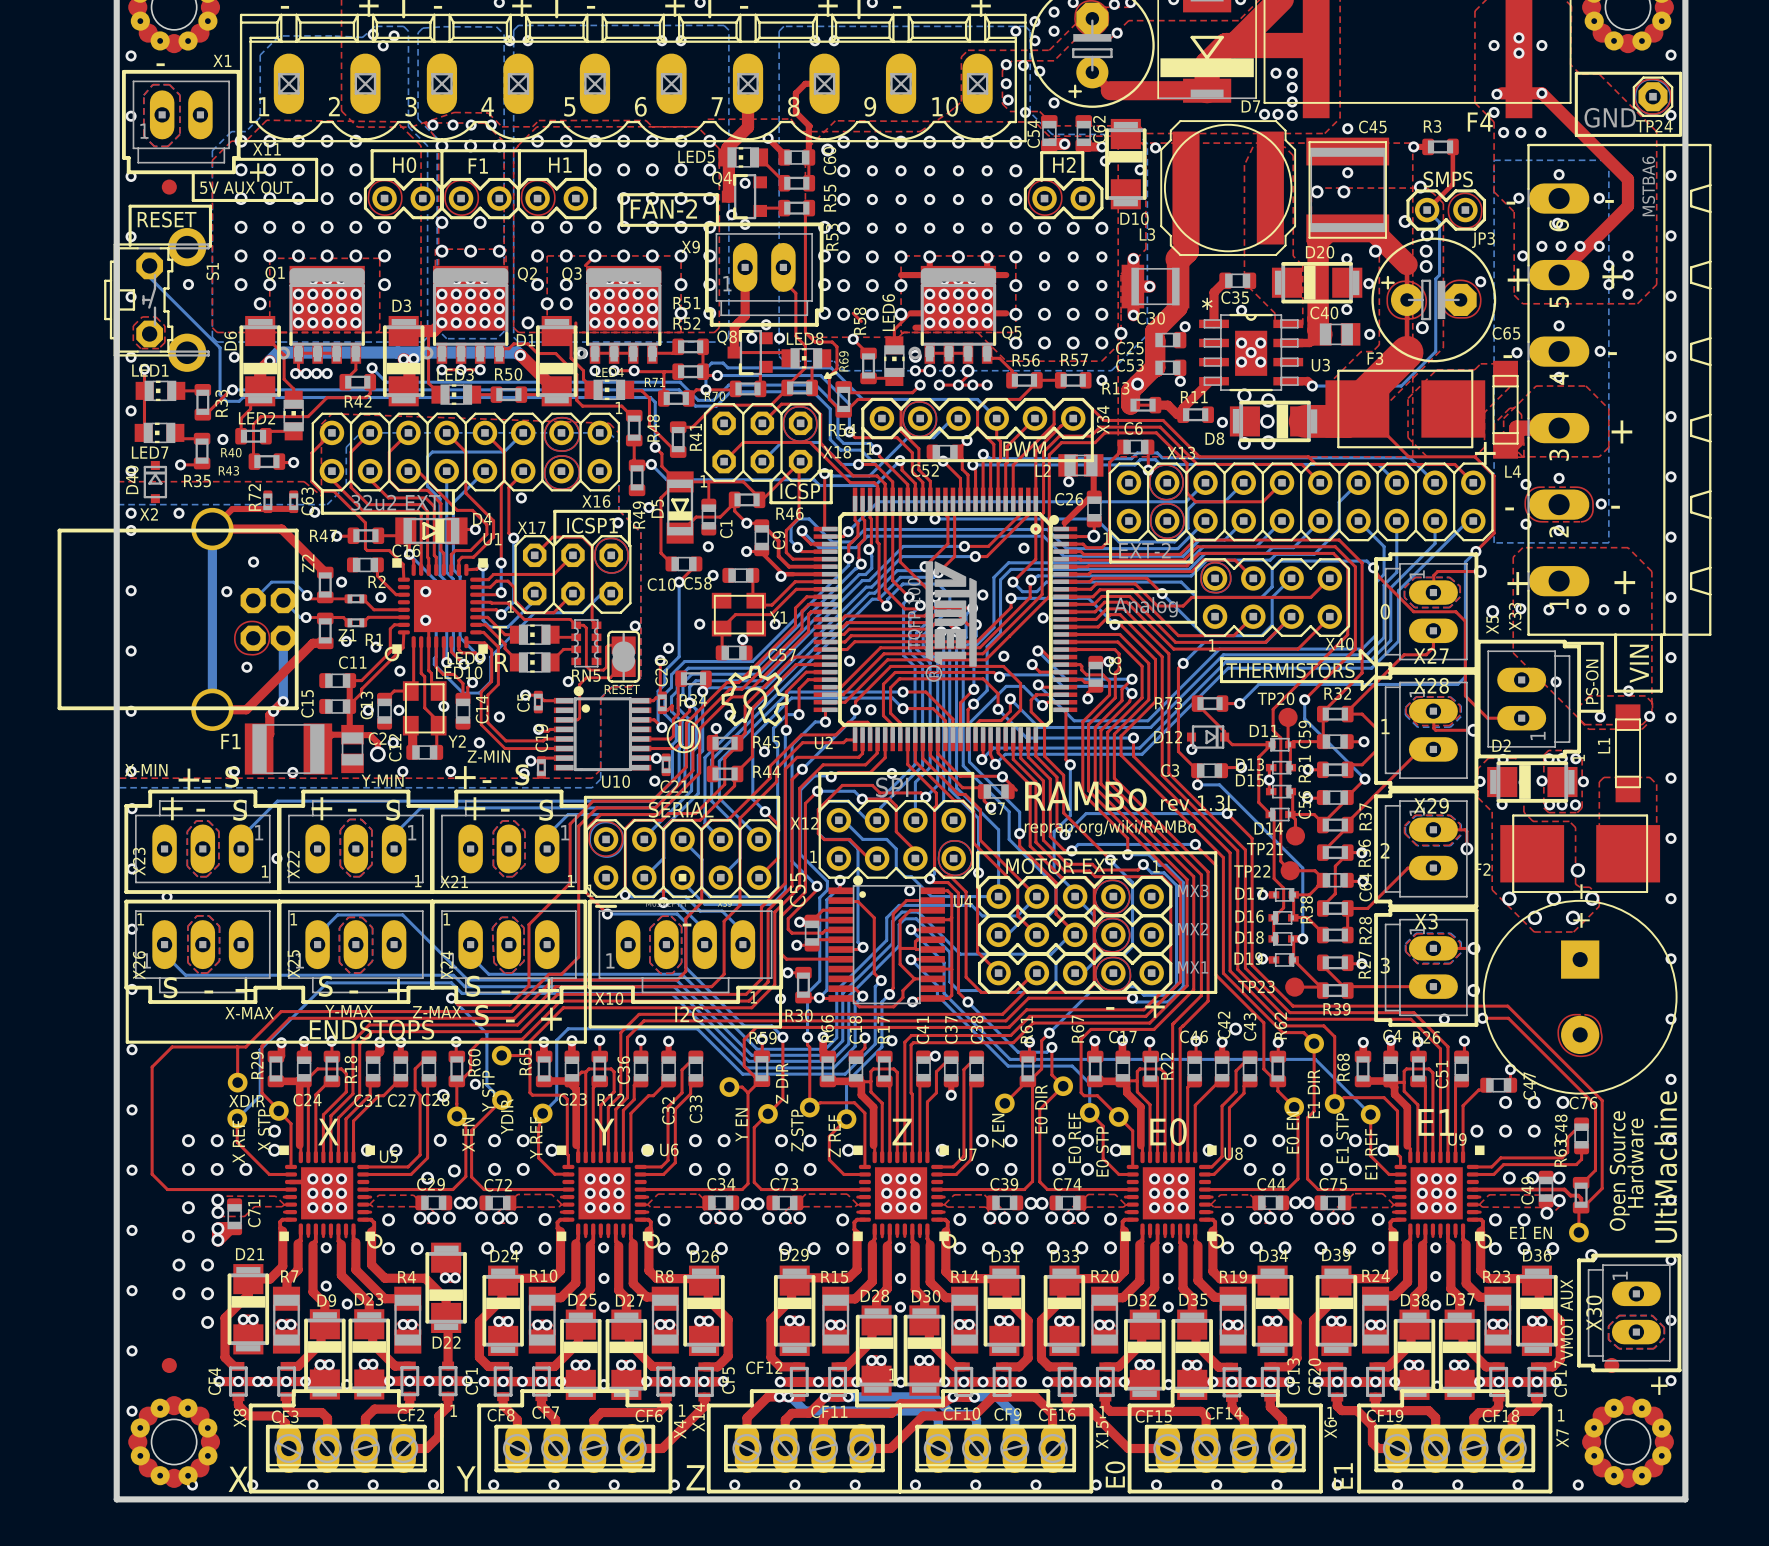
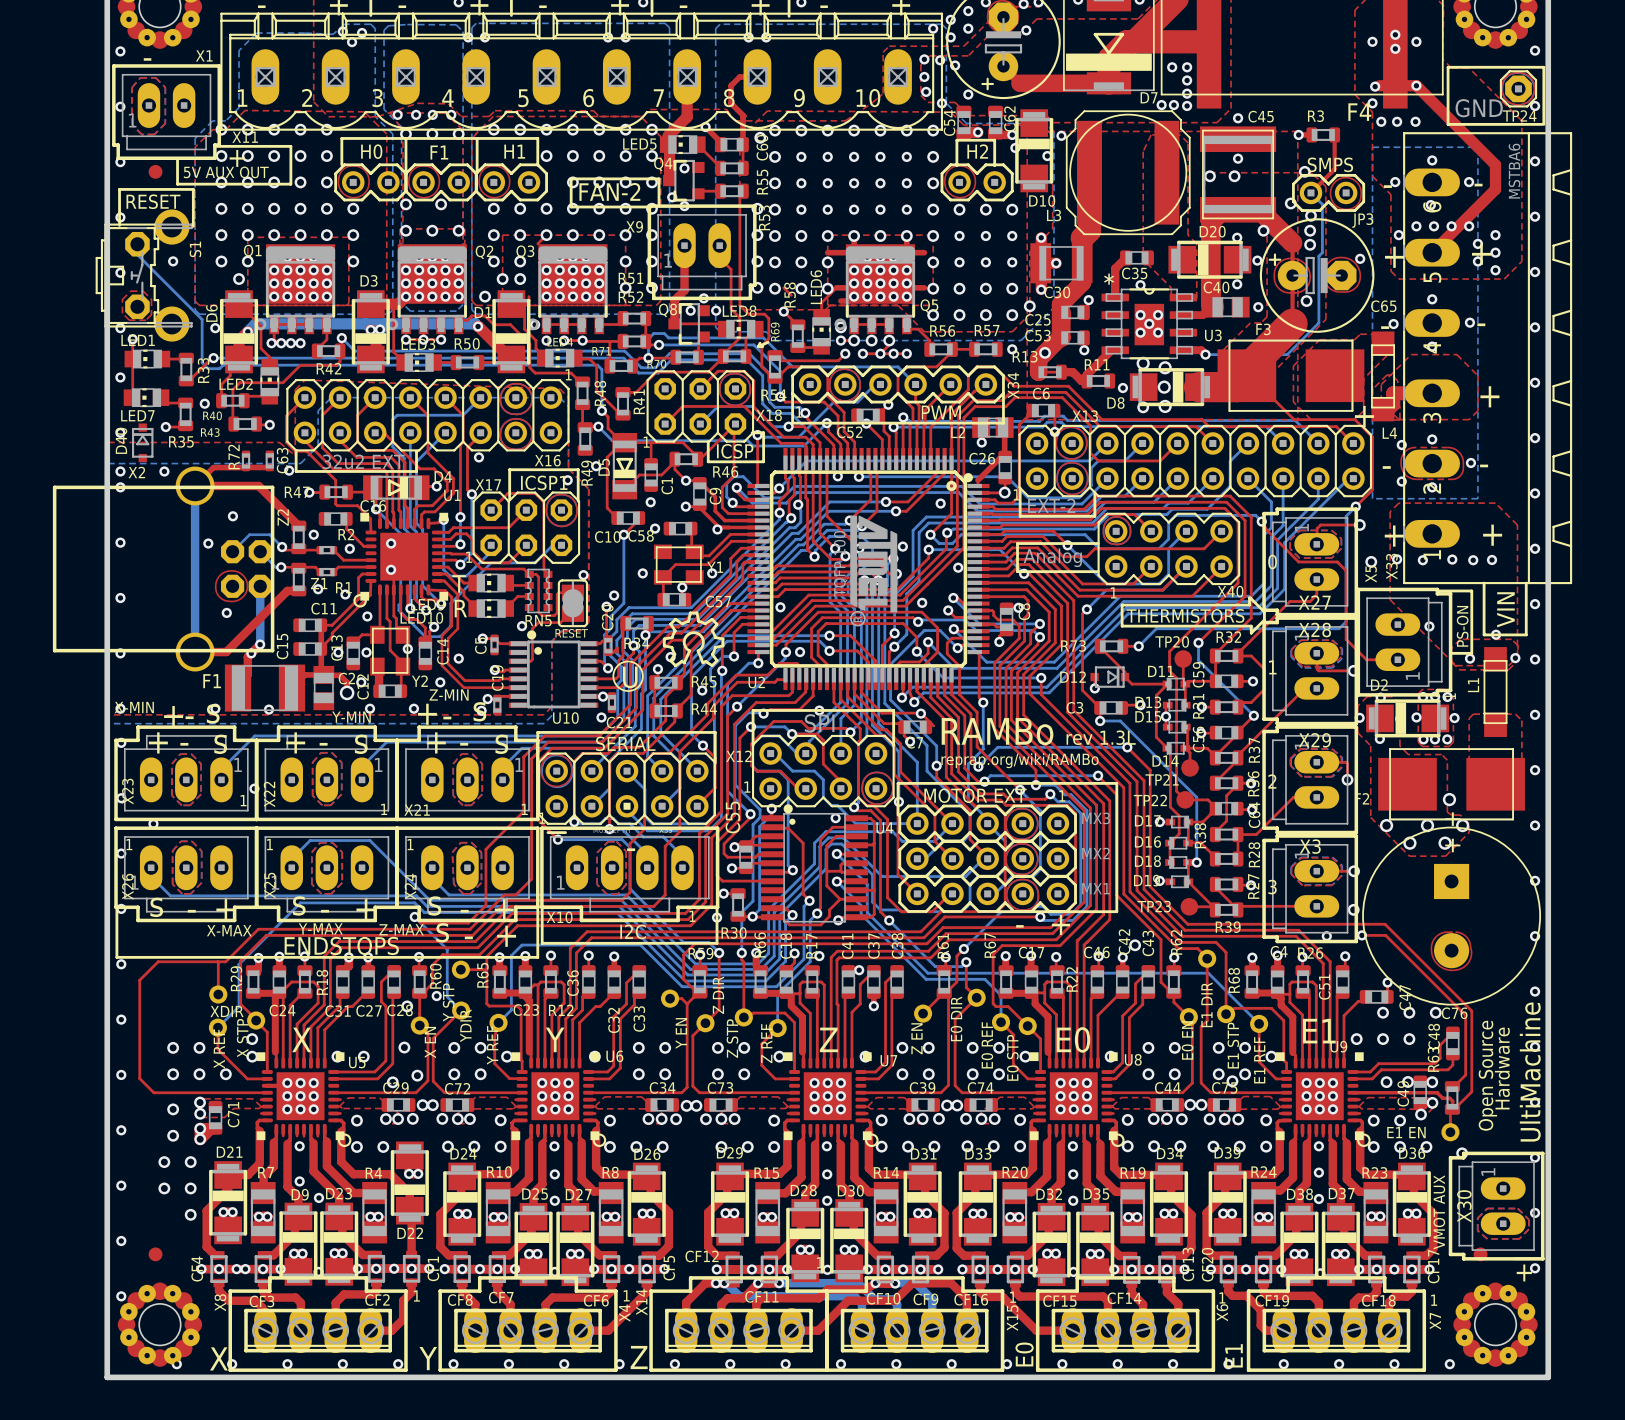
via: none -> (1232, 1081)

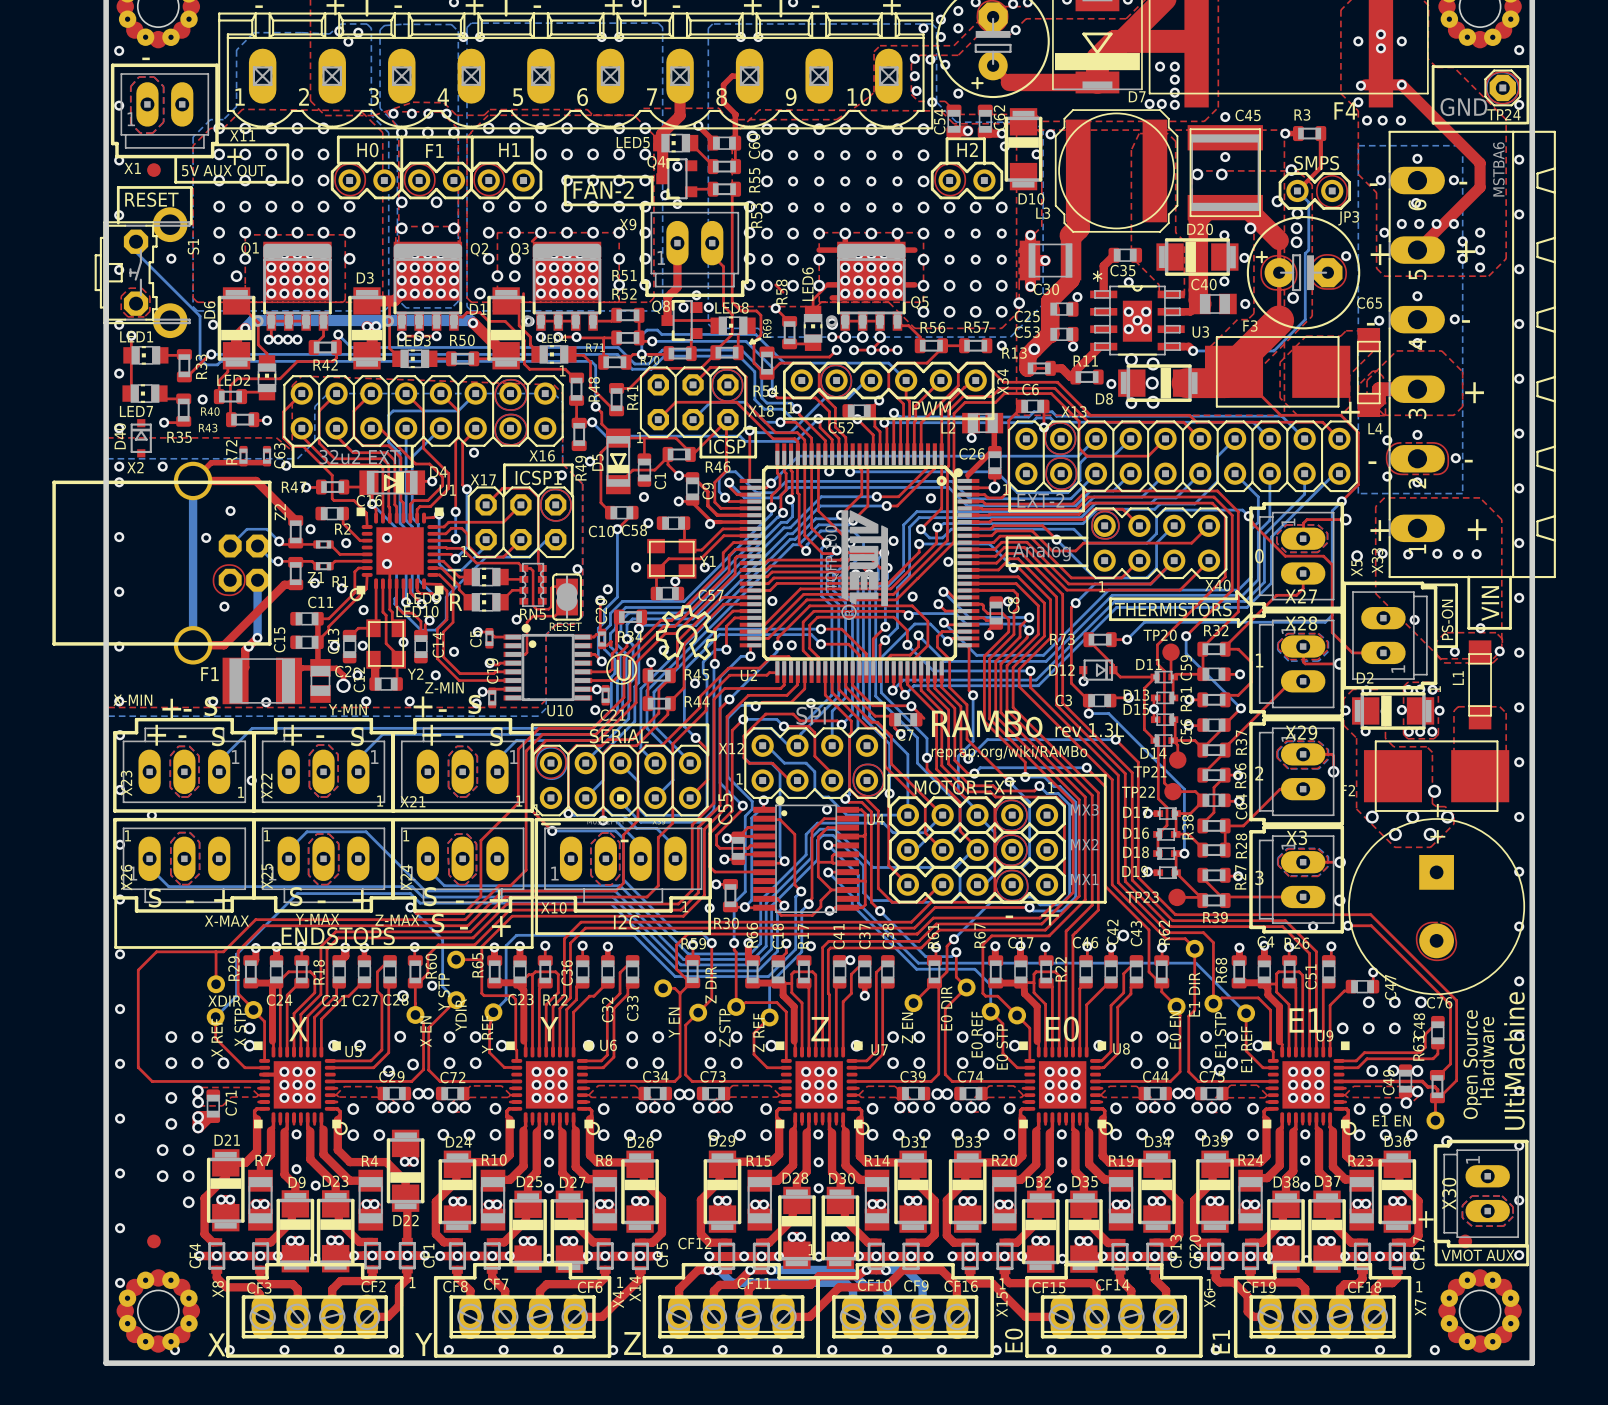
X1 name position: X1 (204, 55) -> X1 (132, 168)
text rotation: 0° (1439, 1212) -> 90° clockwise (1478, 1255)
line: none -> (1436, 1242) (1436, 1264) (1527, 1264) (1527, 1245)
text position: + (1524, 1272) -> + (1426, 1219)

